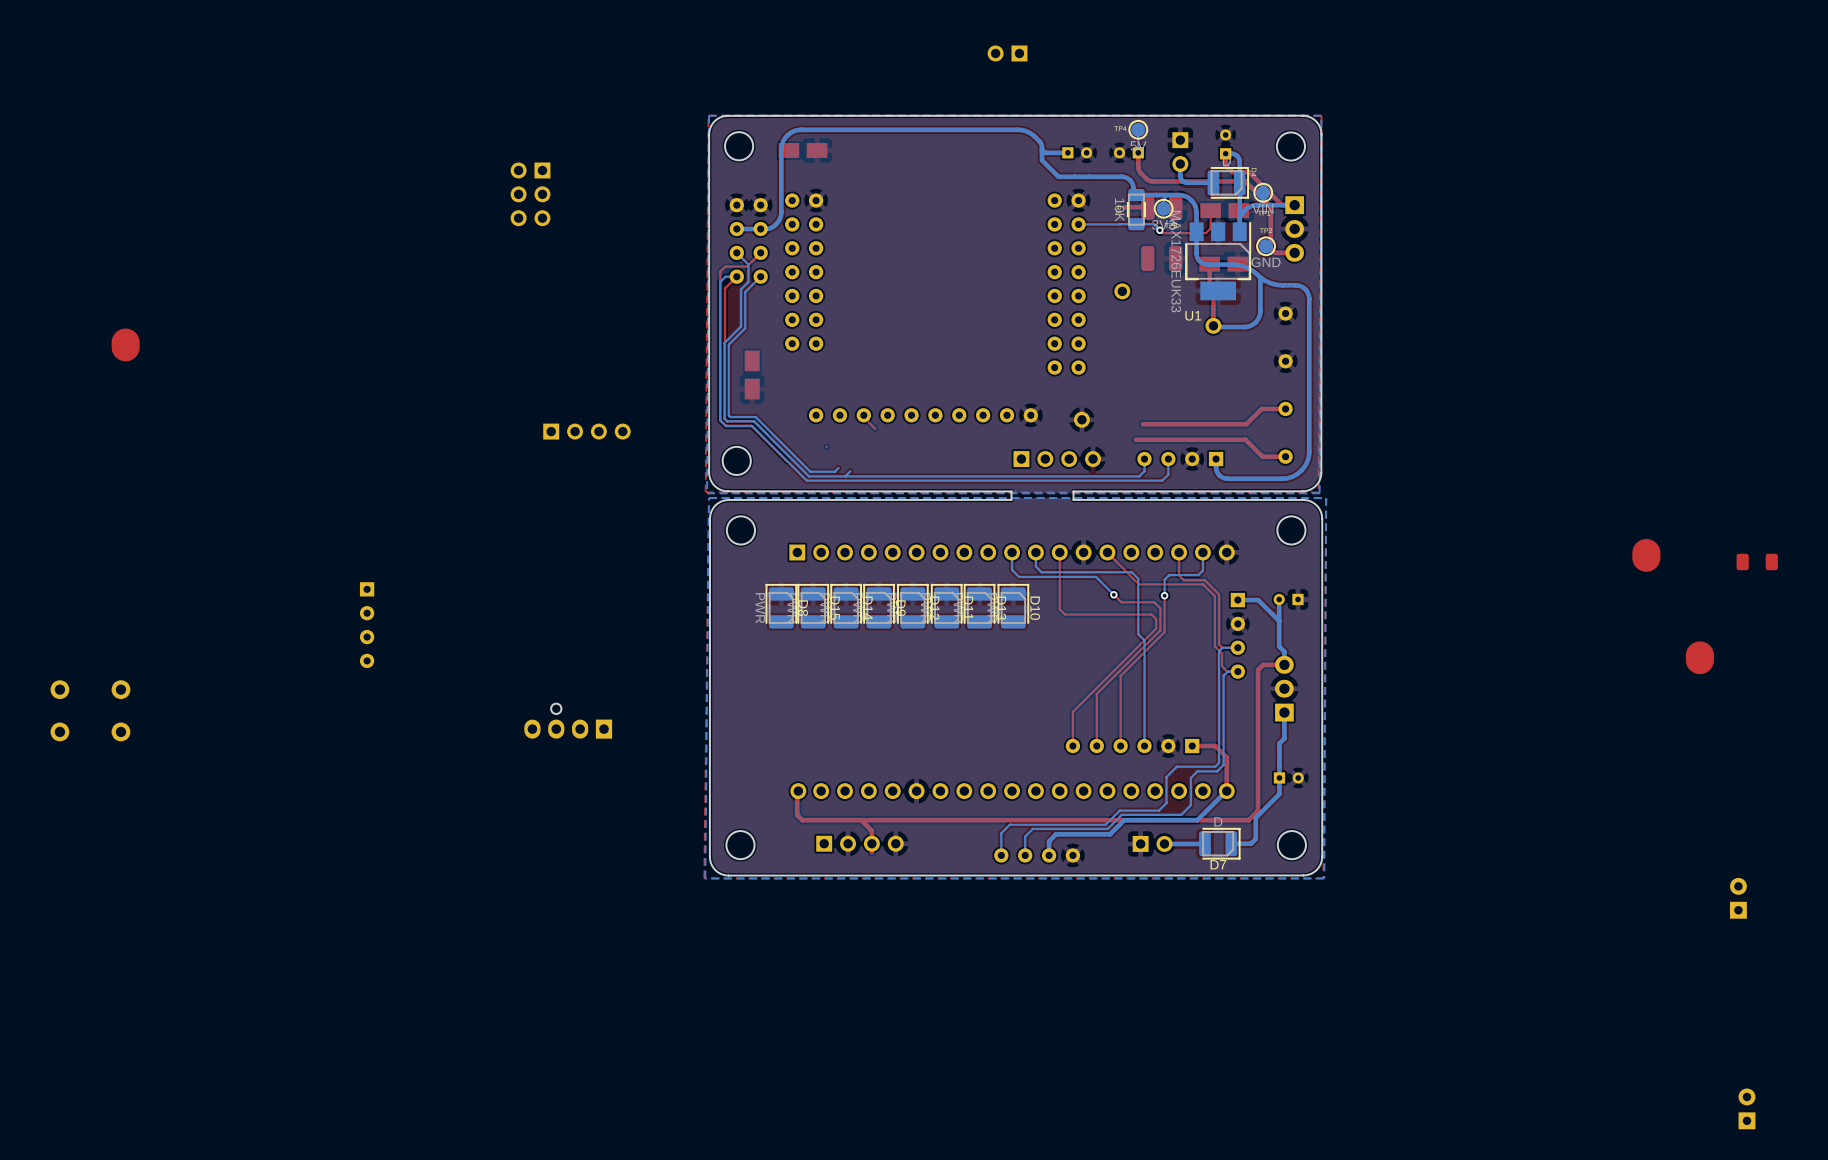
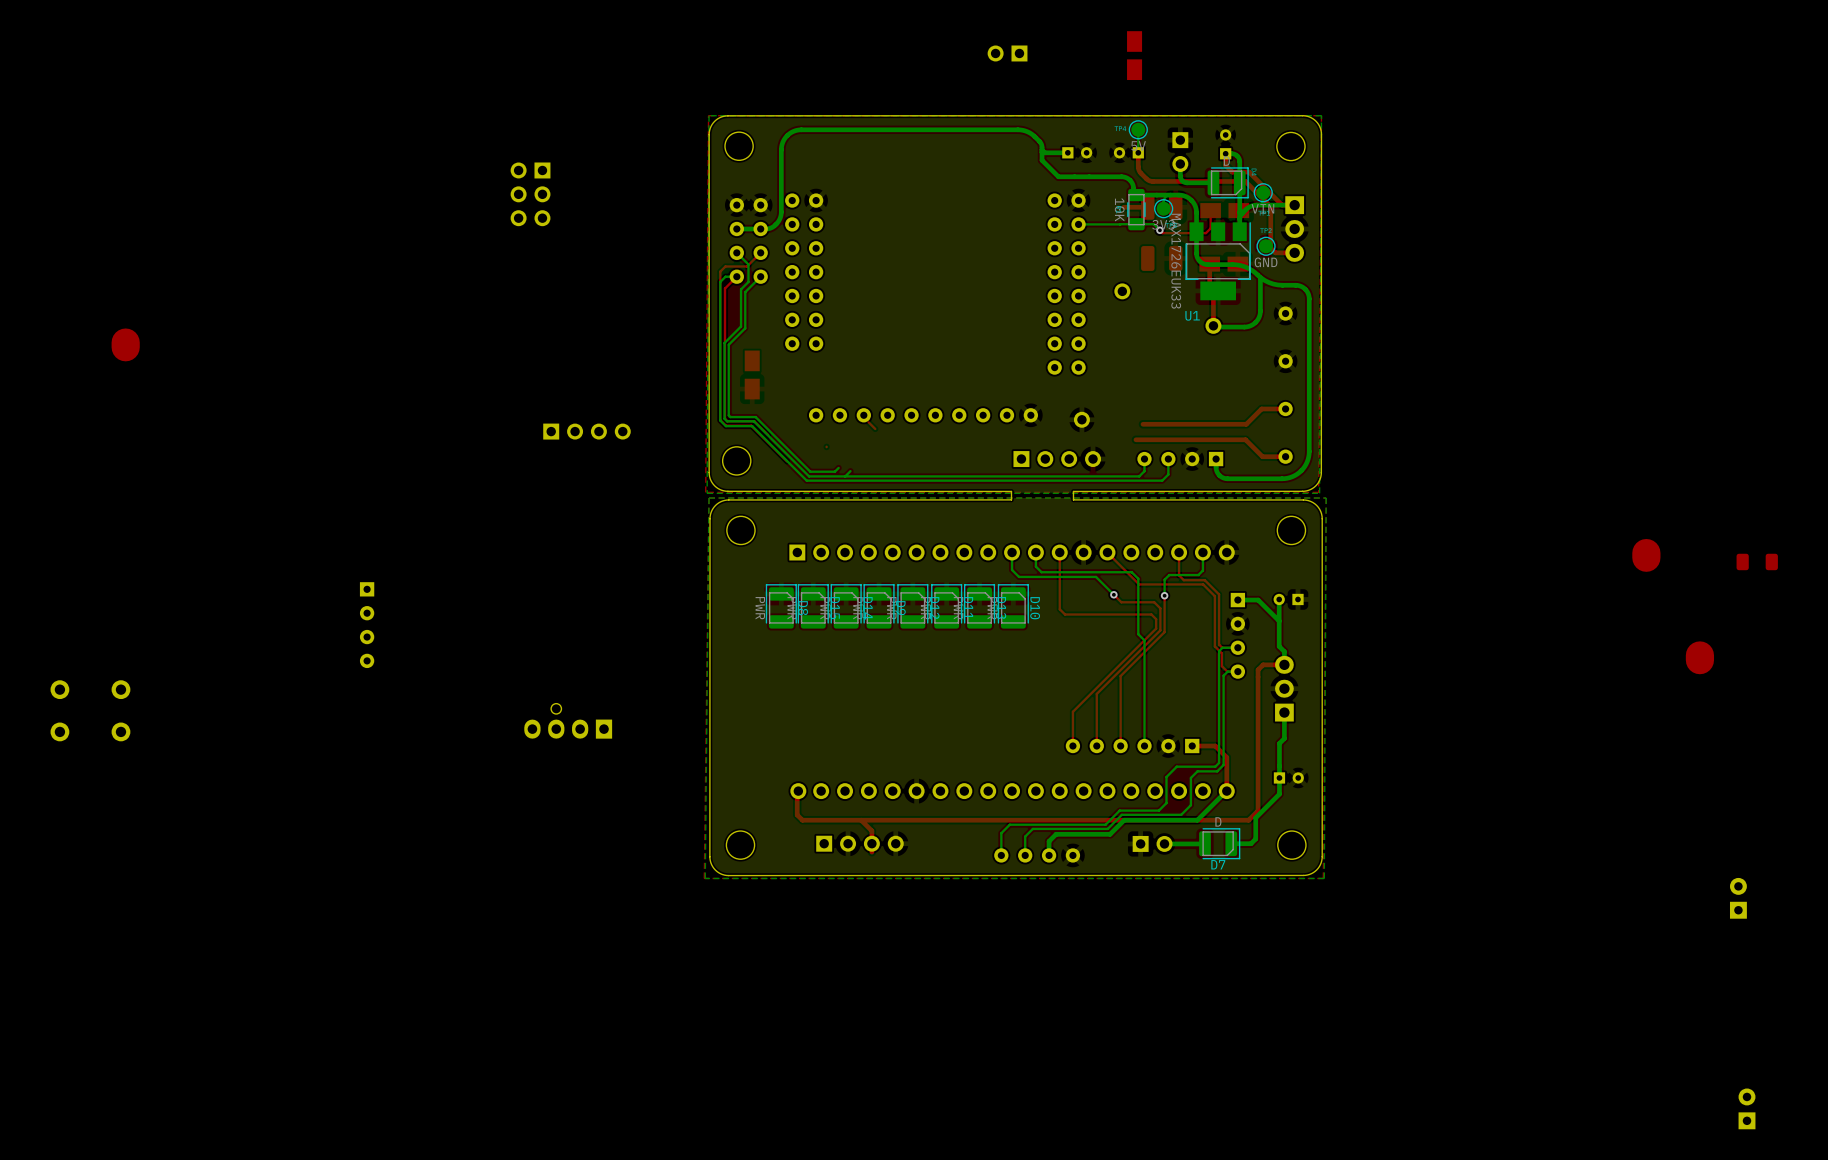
part: none -> (1134, 55)
part: (802, 150) -> none

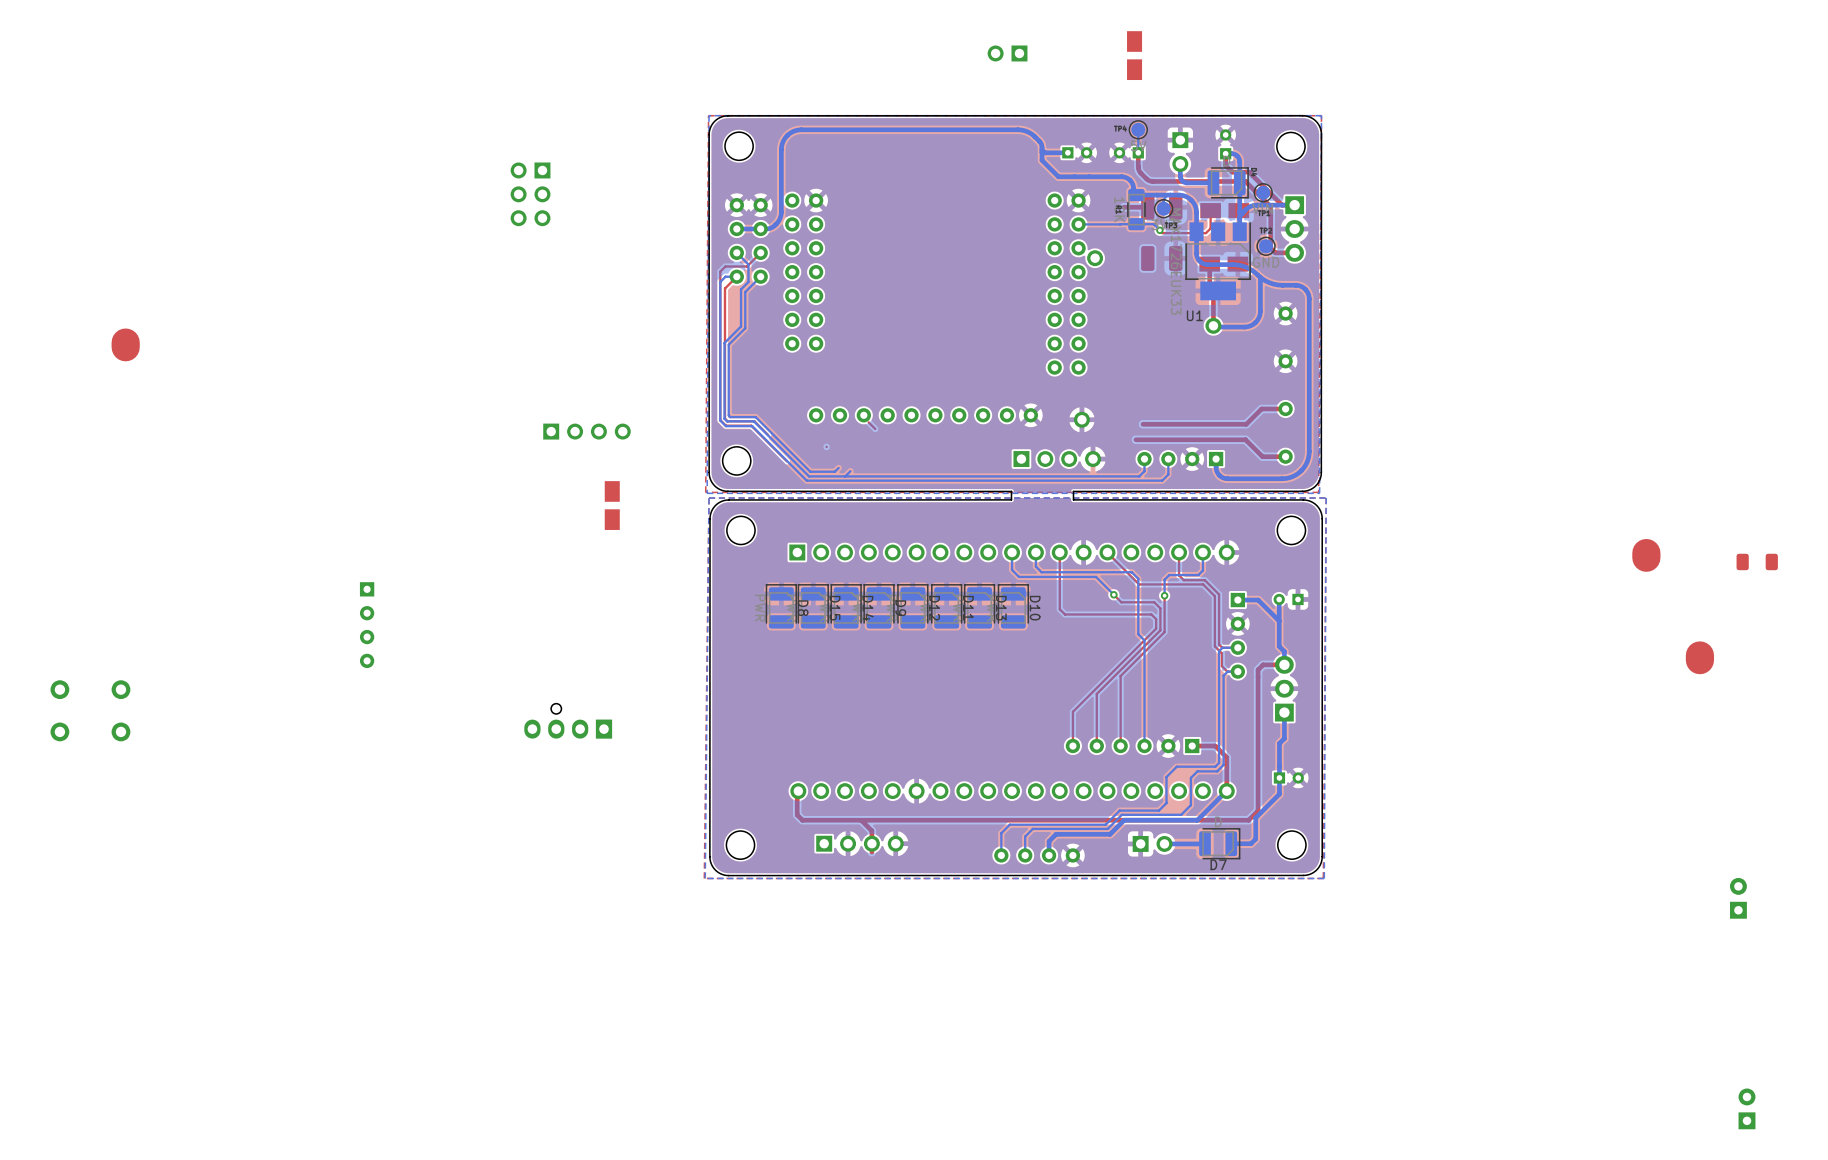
part position: (1122, 291) -> (1095, 258)
part position: (752, 374) -> (612, 505)

